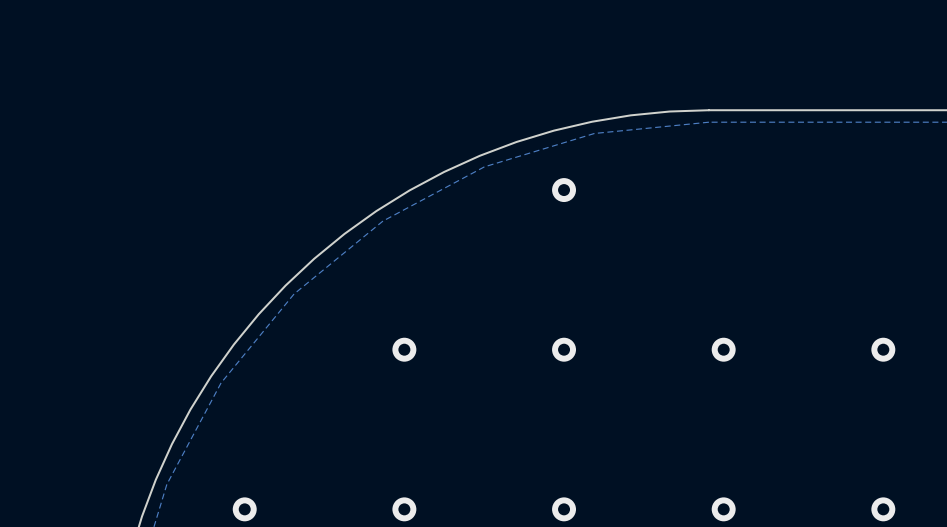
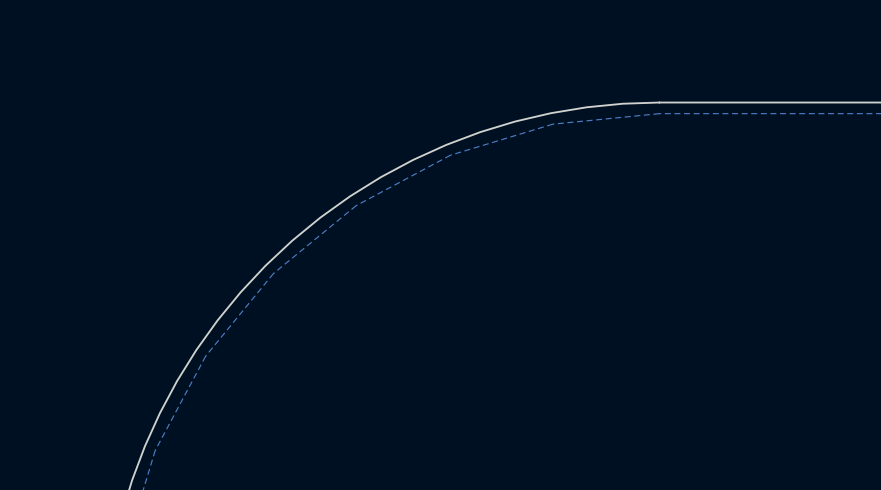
via: (564, 190) -> none
via: (404, 349) -> none
via: (564, 349) -> none
via: (723, 349) -> none
via: (883, 349) -> none
via: (244, 509) -> none
via: (404, 509) -> none
via: (564, 509) -> none
via: (723, 509) -> none
via: (883, 509) -> none

